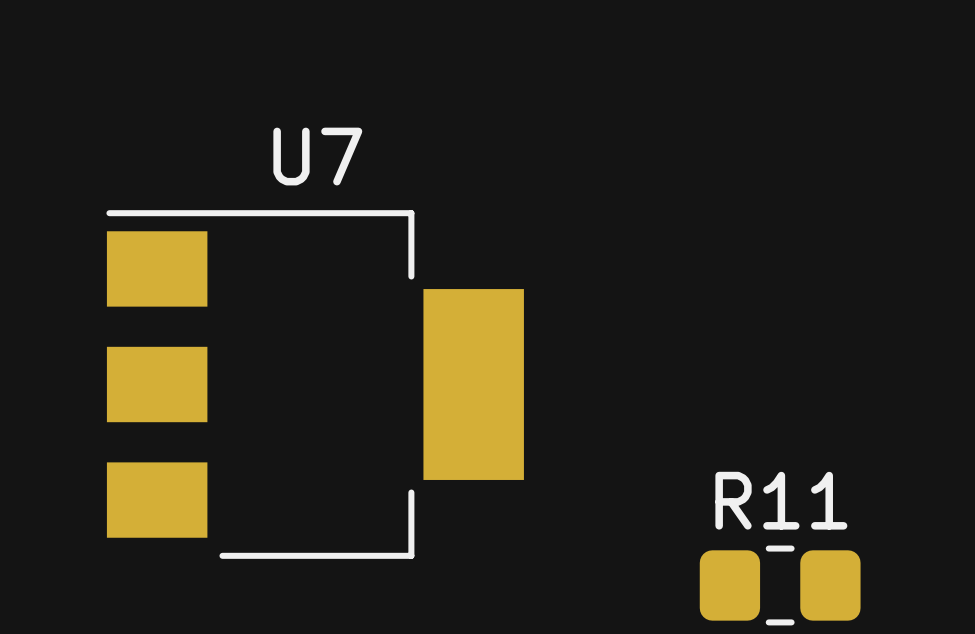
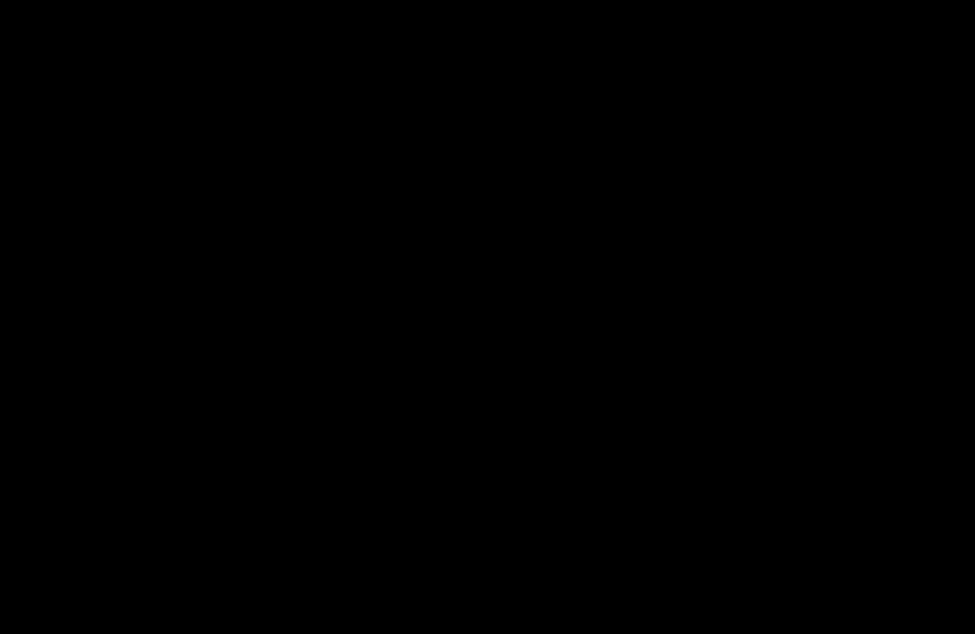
U7: (315, 384) -> none
R11: (780, 585) -> none

